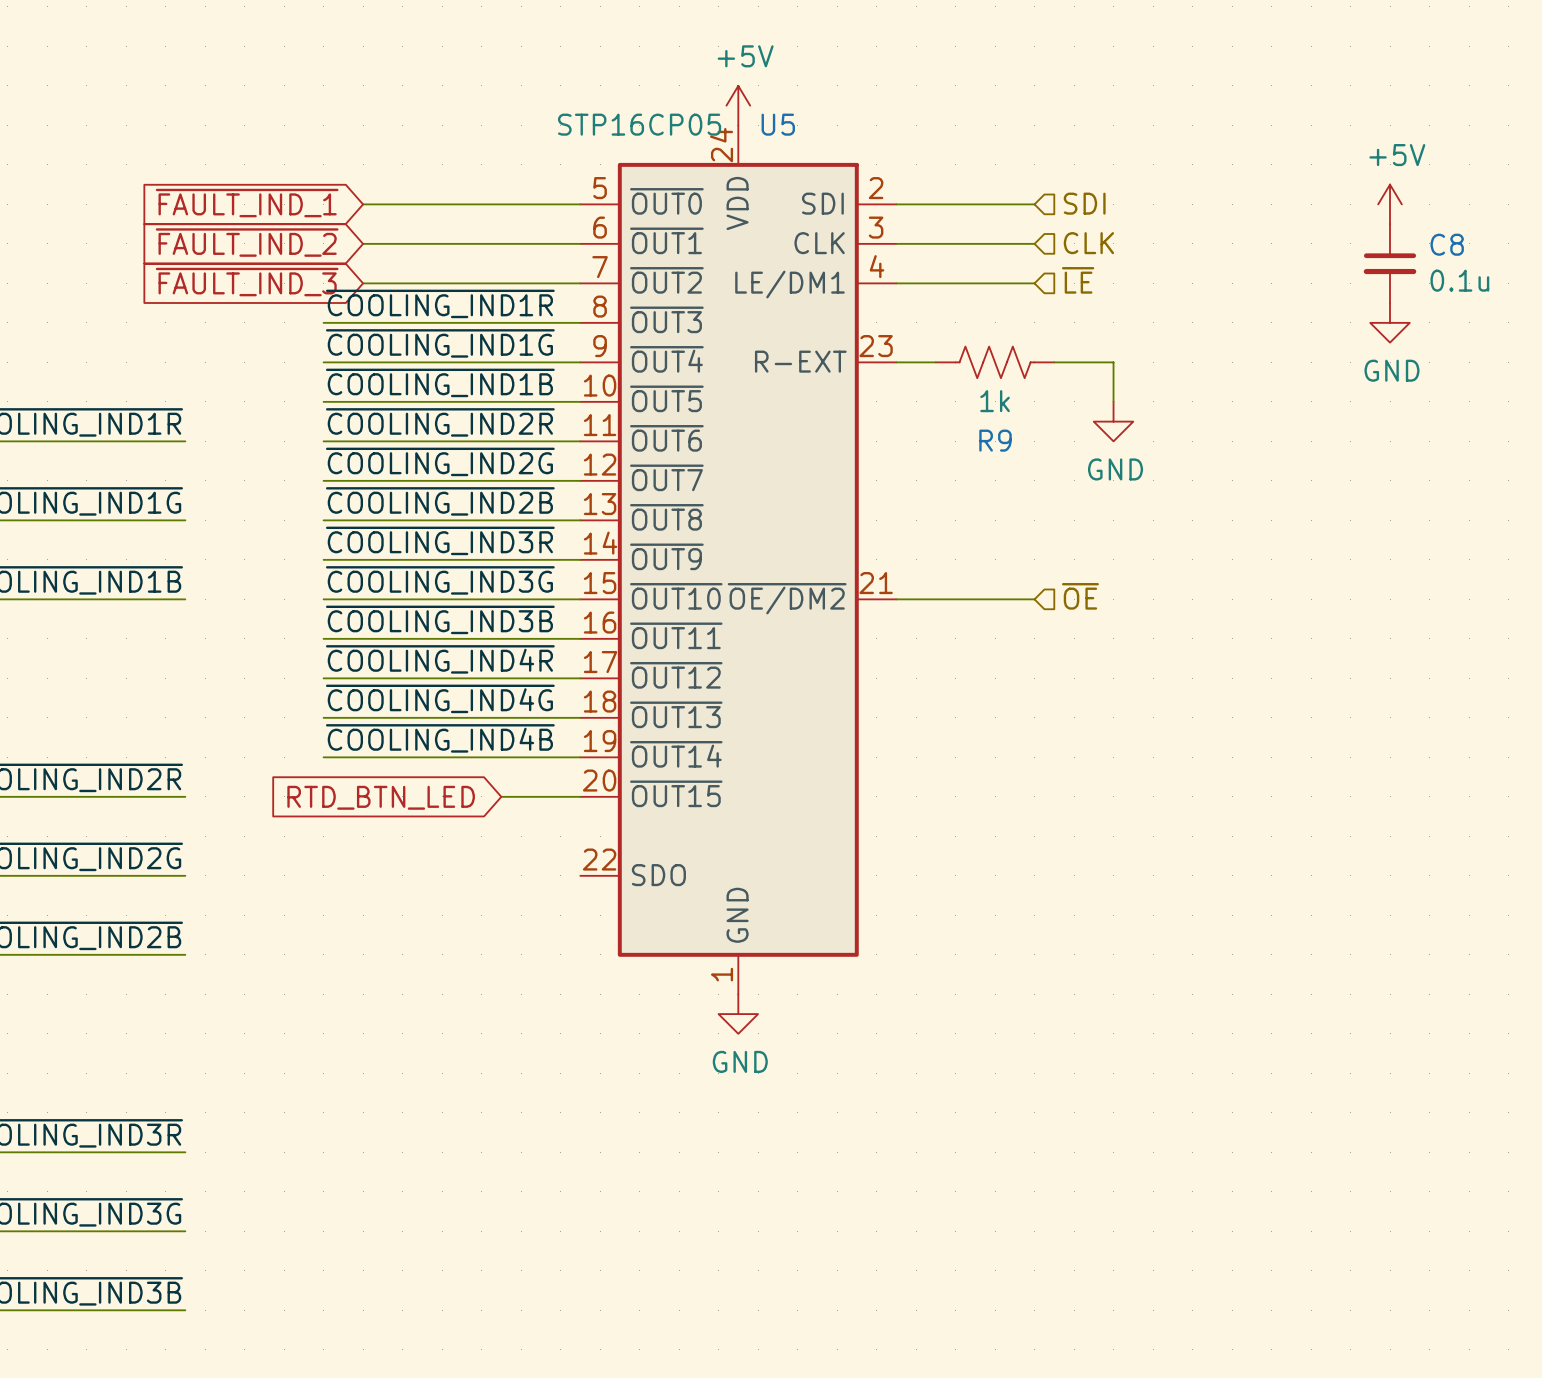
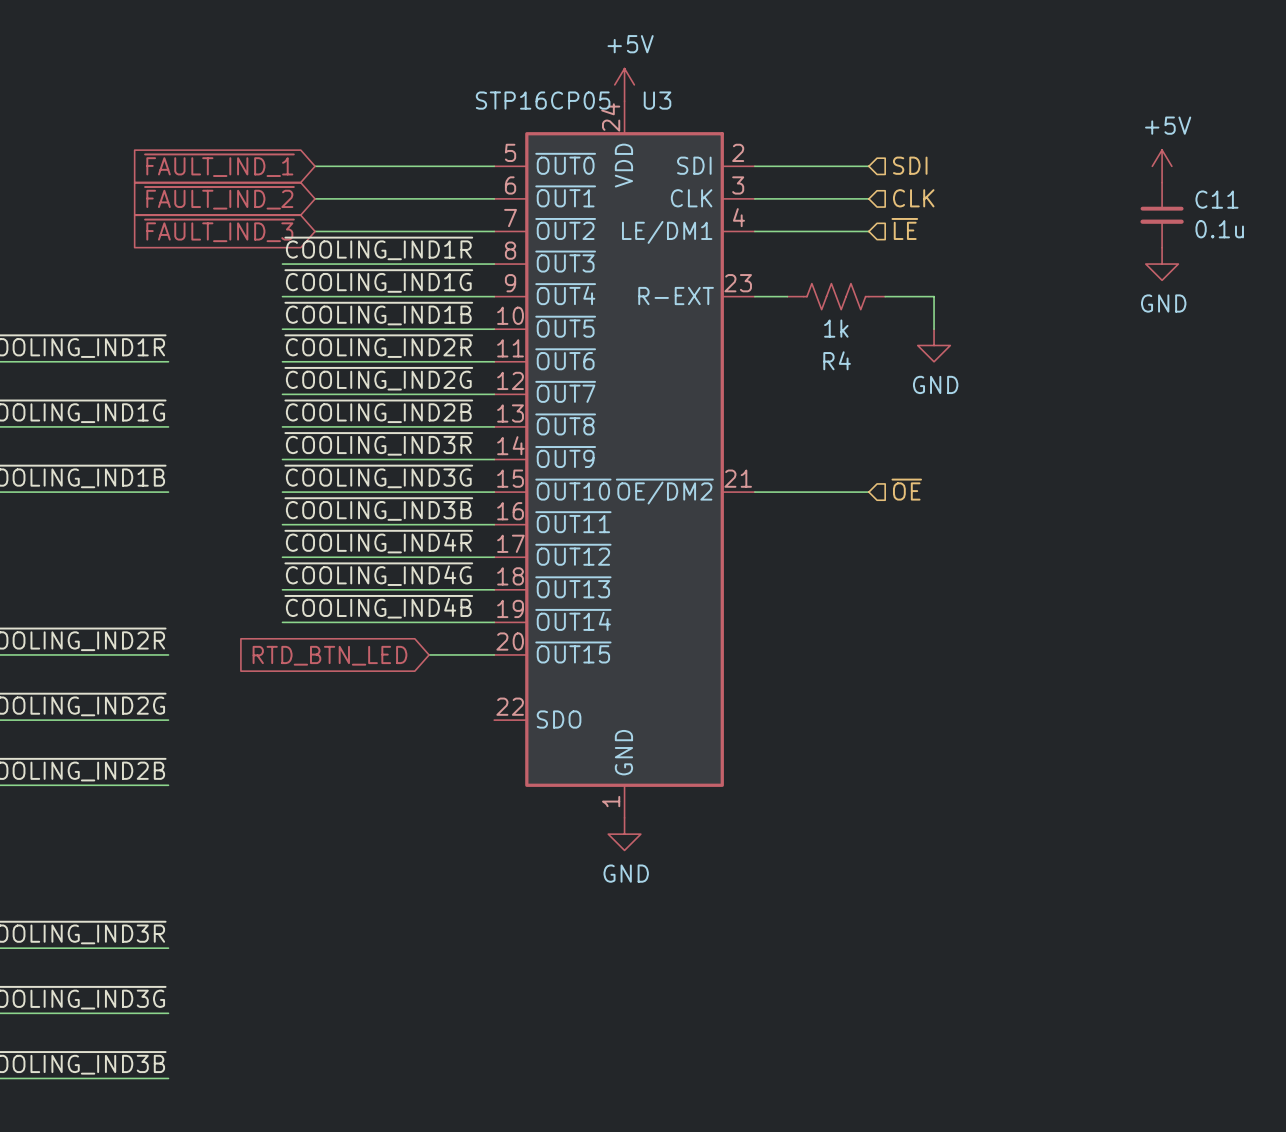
U5 name: U5 (778, 124) -> U3 (657, 100)
C8 name: C8 (1447, 244) -> C11 (1216, 199)
R9 name: R9 (995, 440) -> R4 (837, 360)

